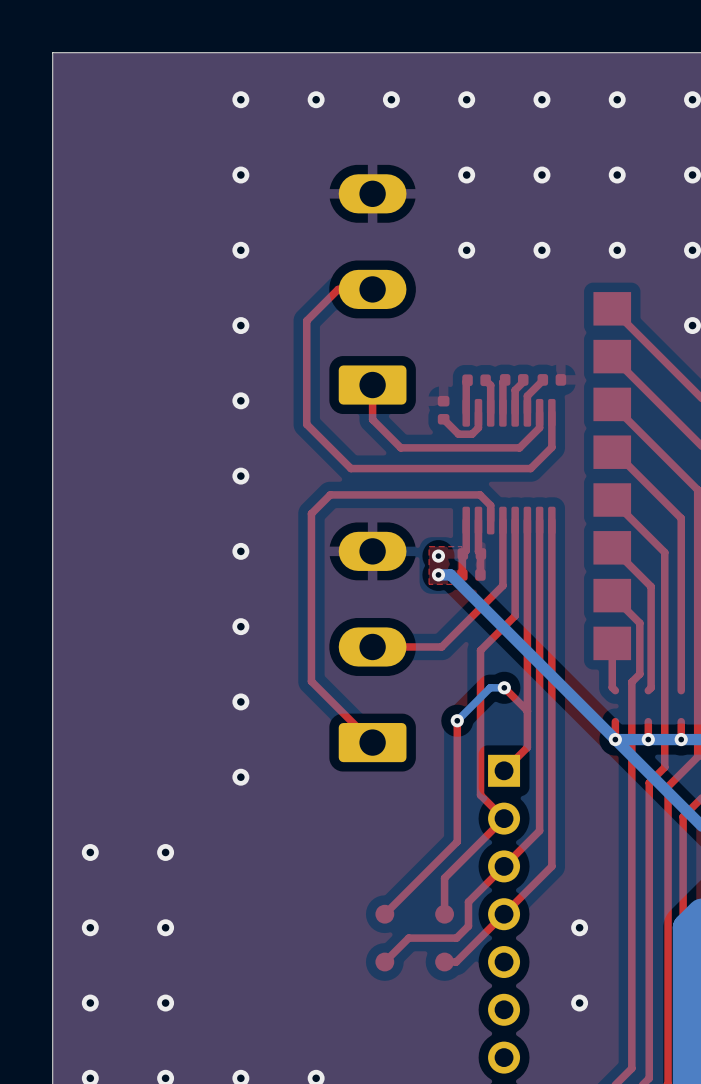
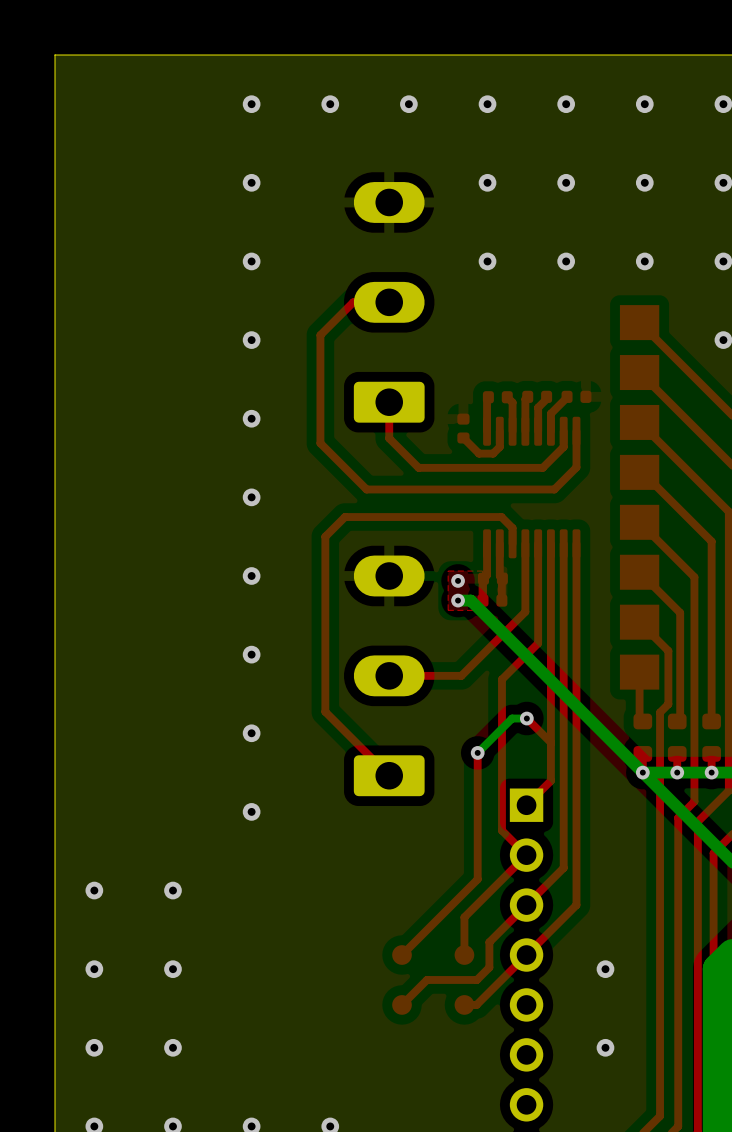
part: none -> (642, 737)
part: none -> (677, 737)
part: none -> (711, 737)

